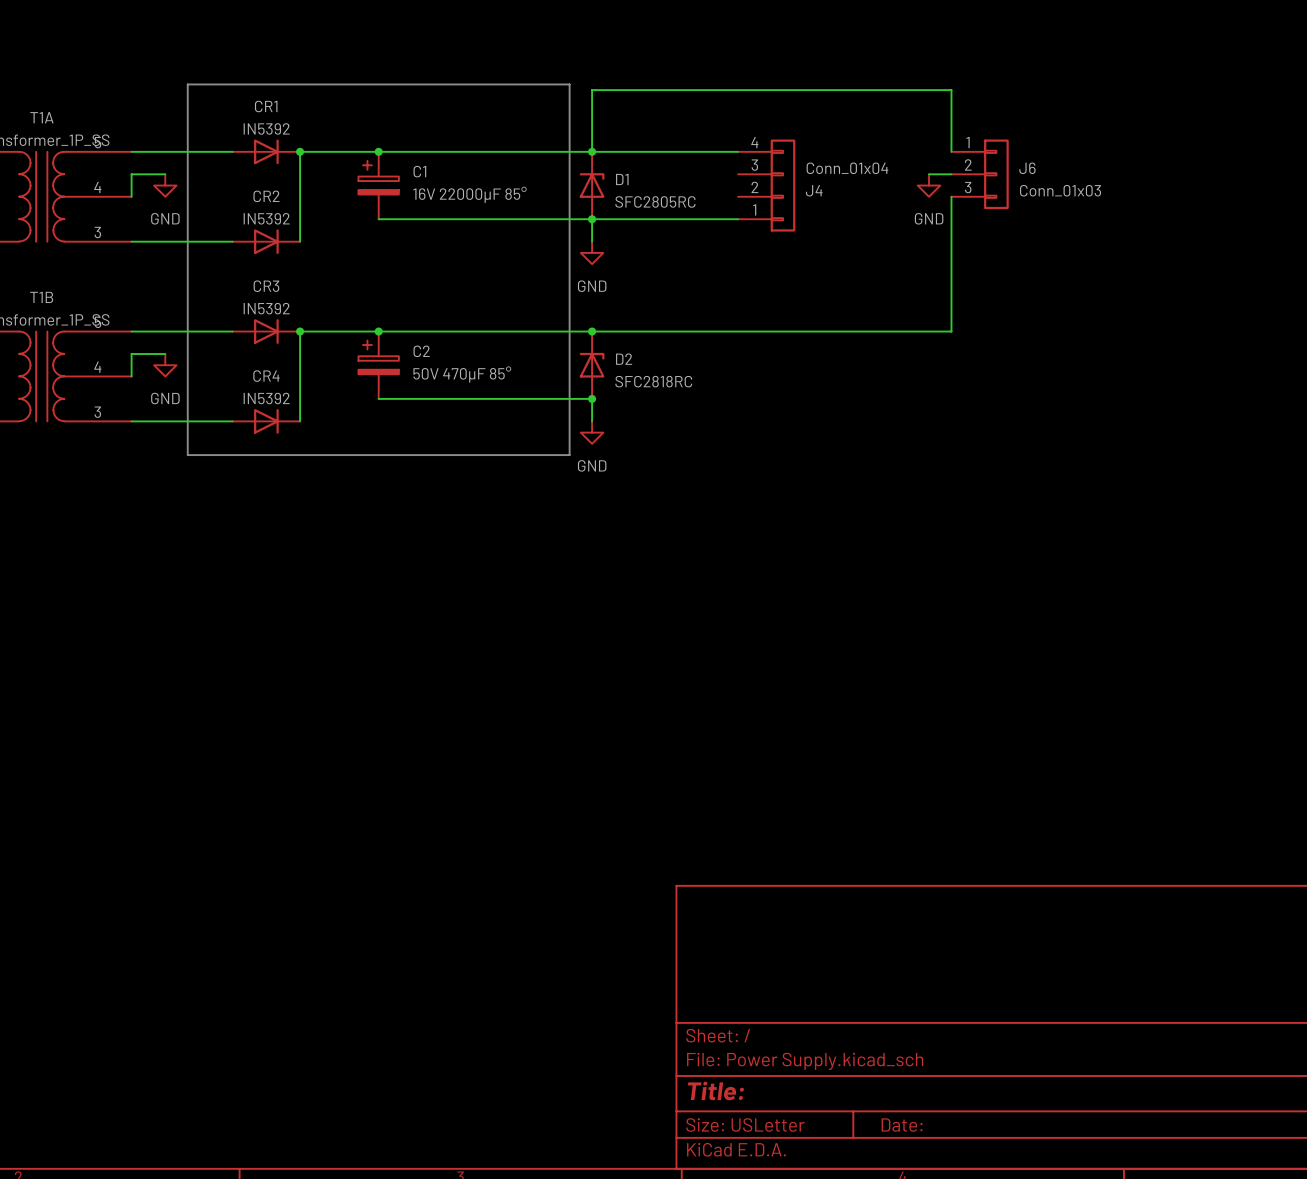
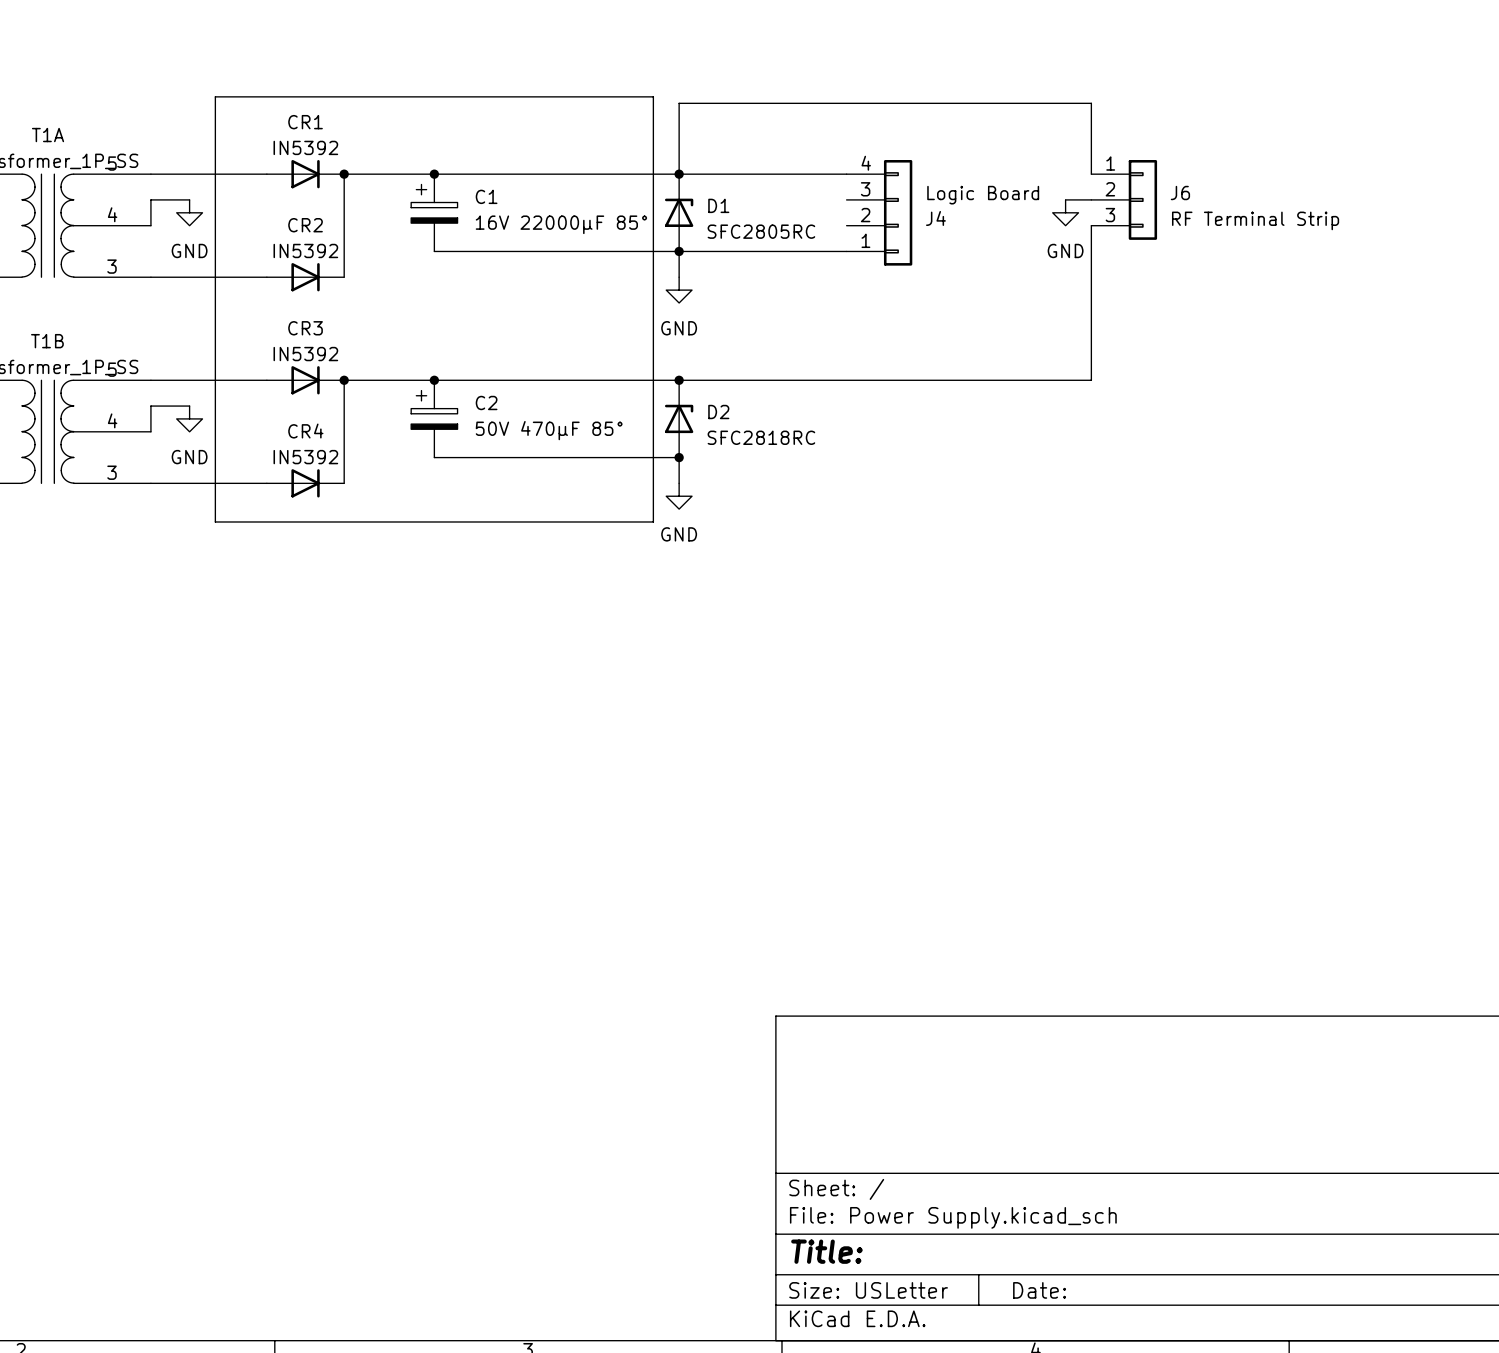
J4 value: Conn_01x04 (847, 168) -> Logic Board (983, 195)
J6 value: Conn_01x03 (1060, 190) -> RF Terminal Strip (1255, 220)

